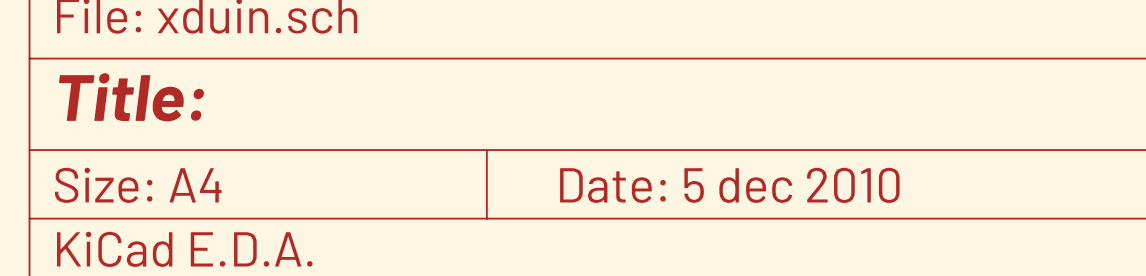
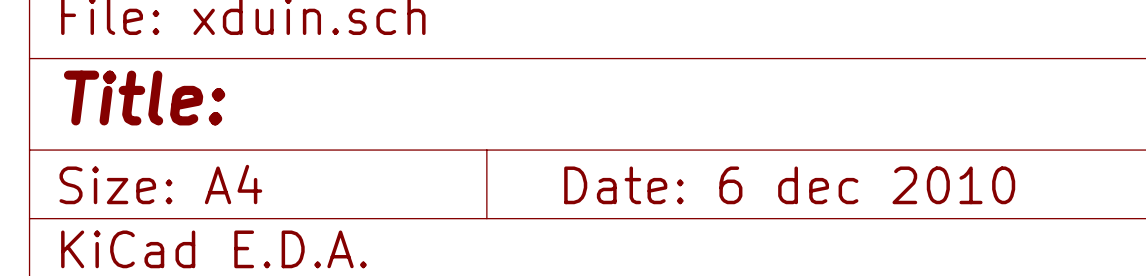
title block: Date: 5 dec 2010 (729, 185) -> Date: 6 dec 2010 (789, 185)

